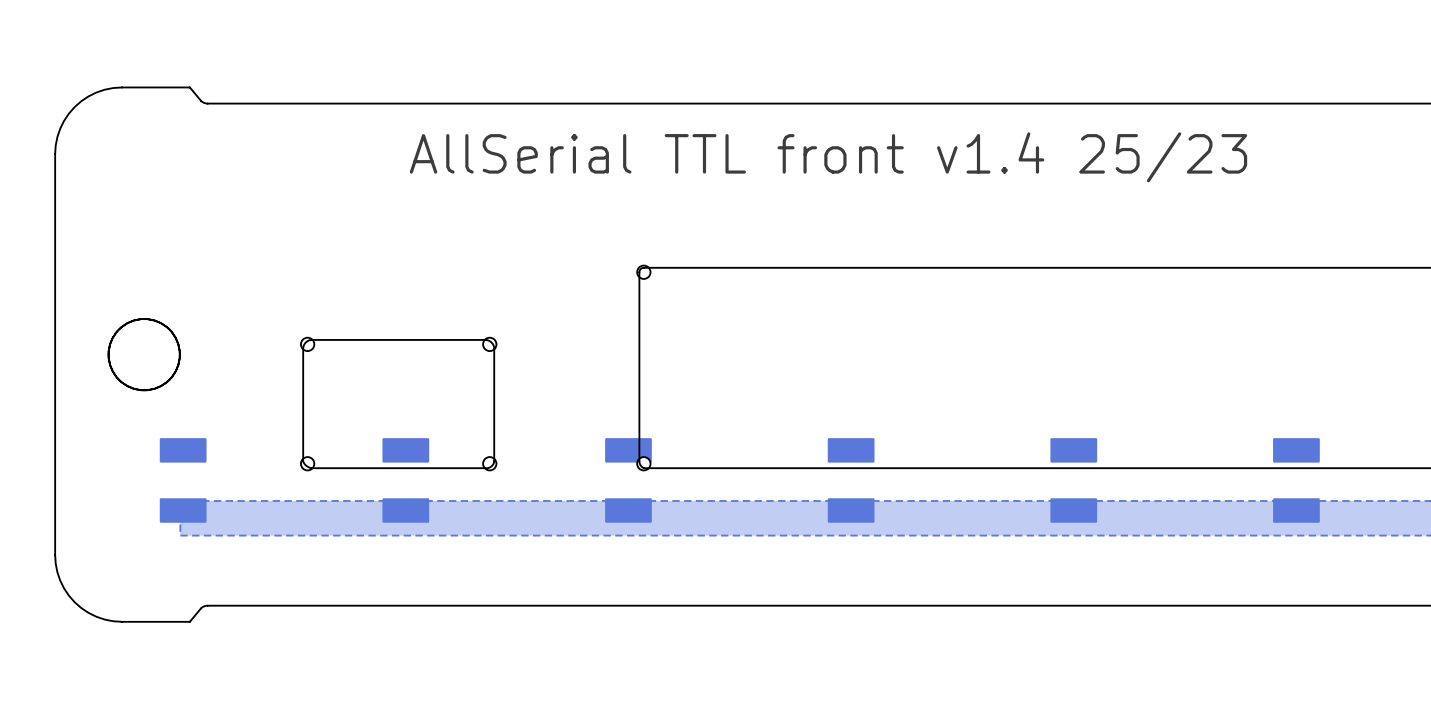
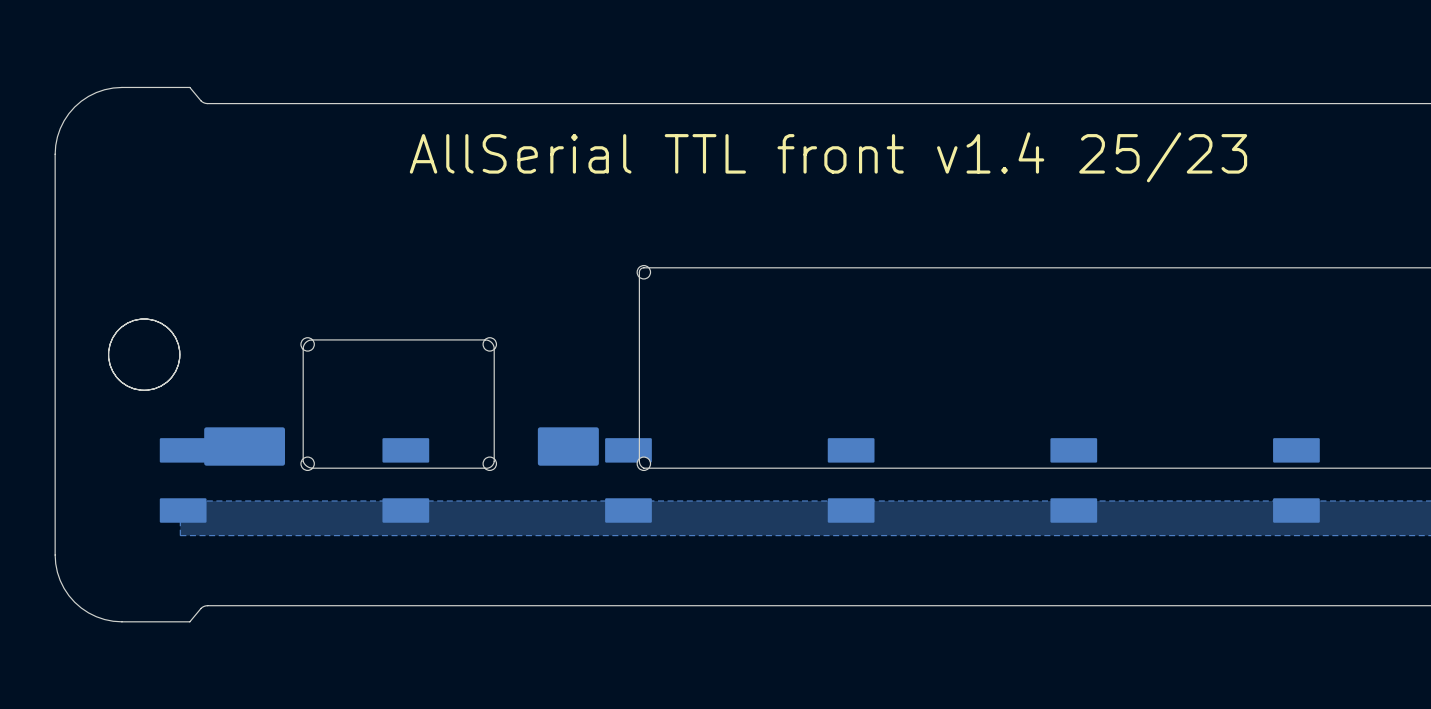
drawing: none -> [204, 427, 285, 466]
drawing: none -> [537, 427, 599, 466]

